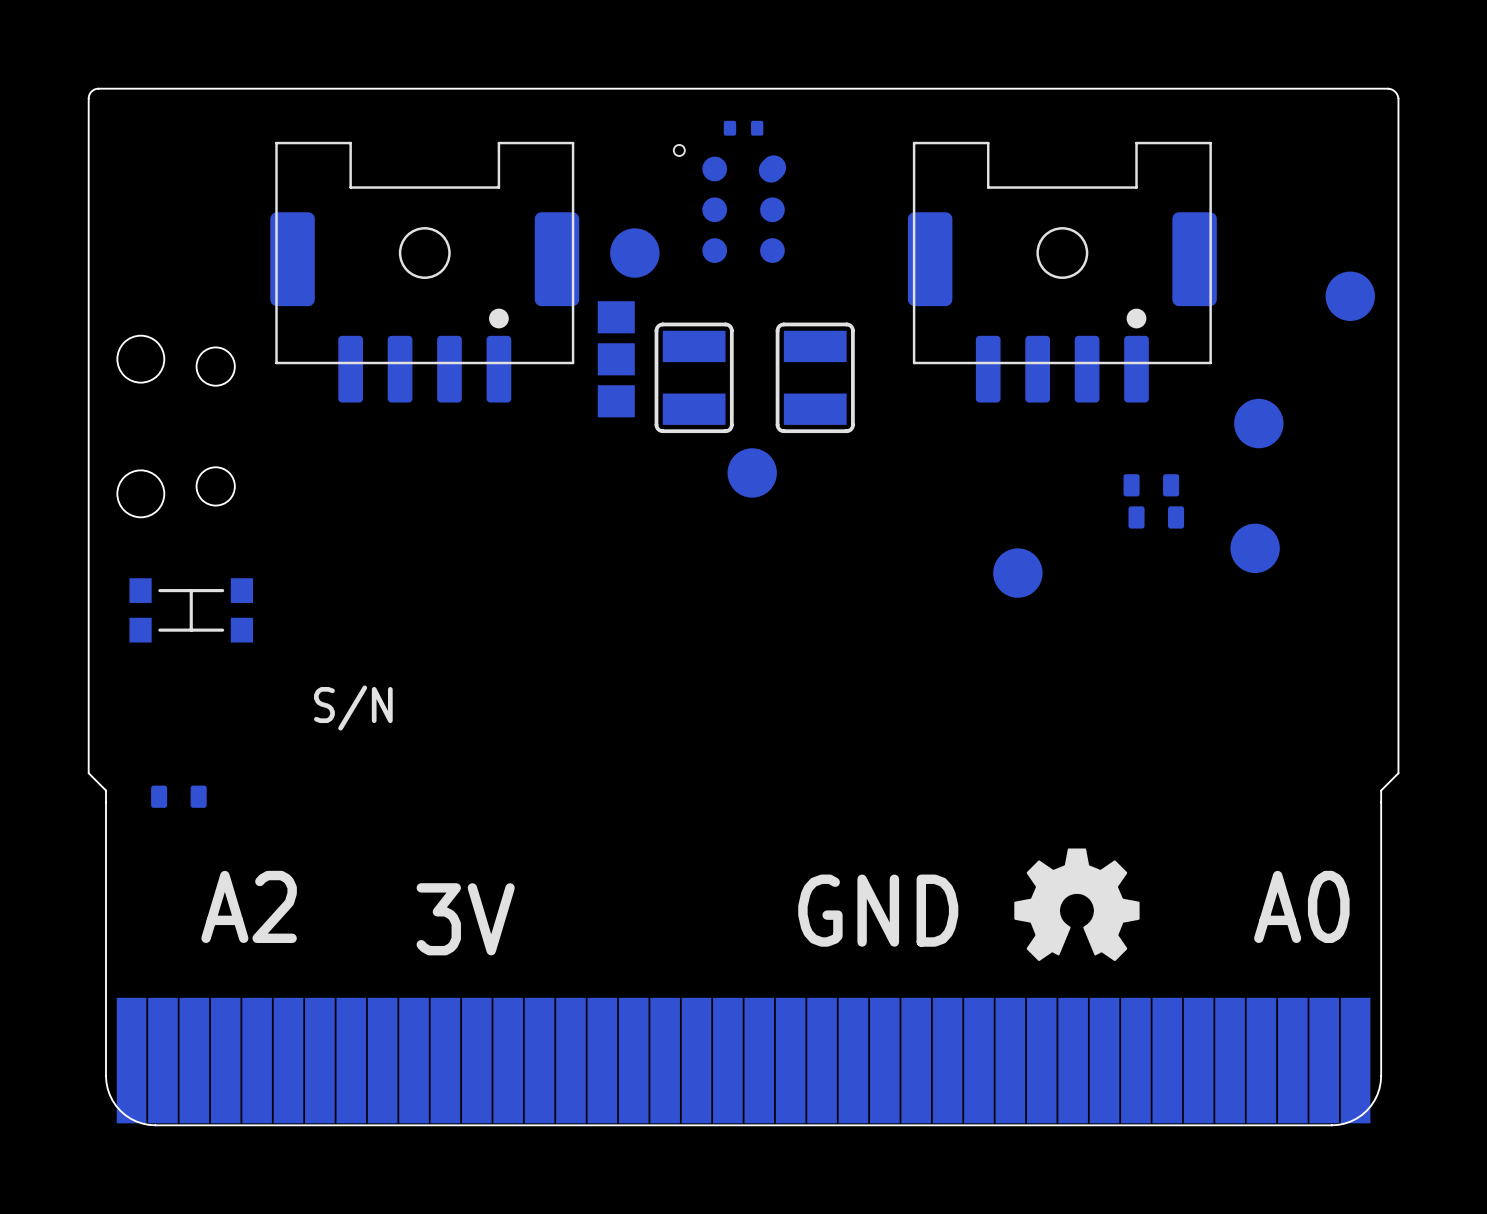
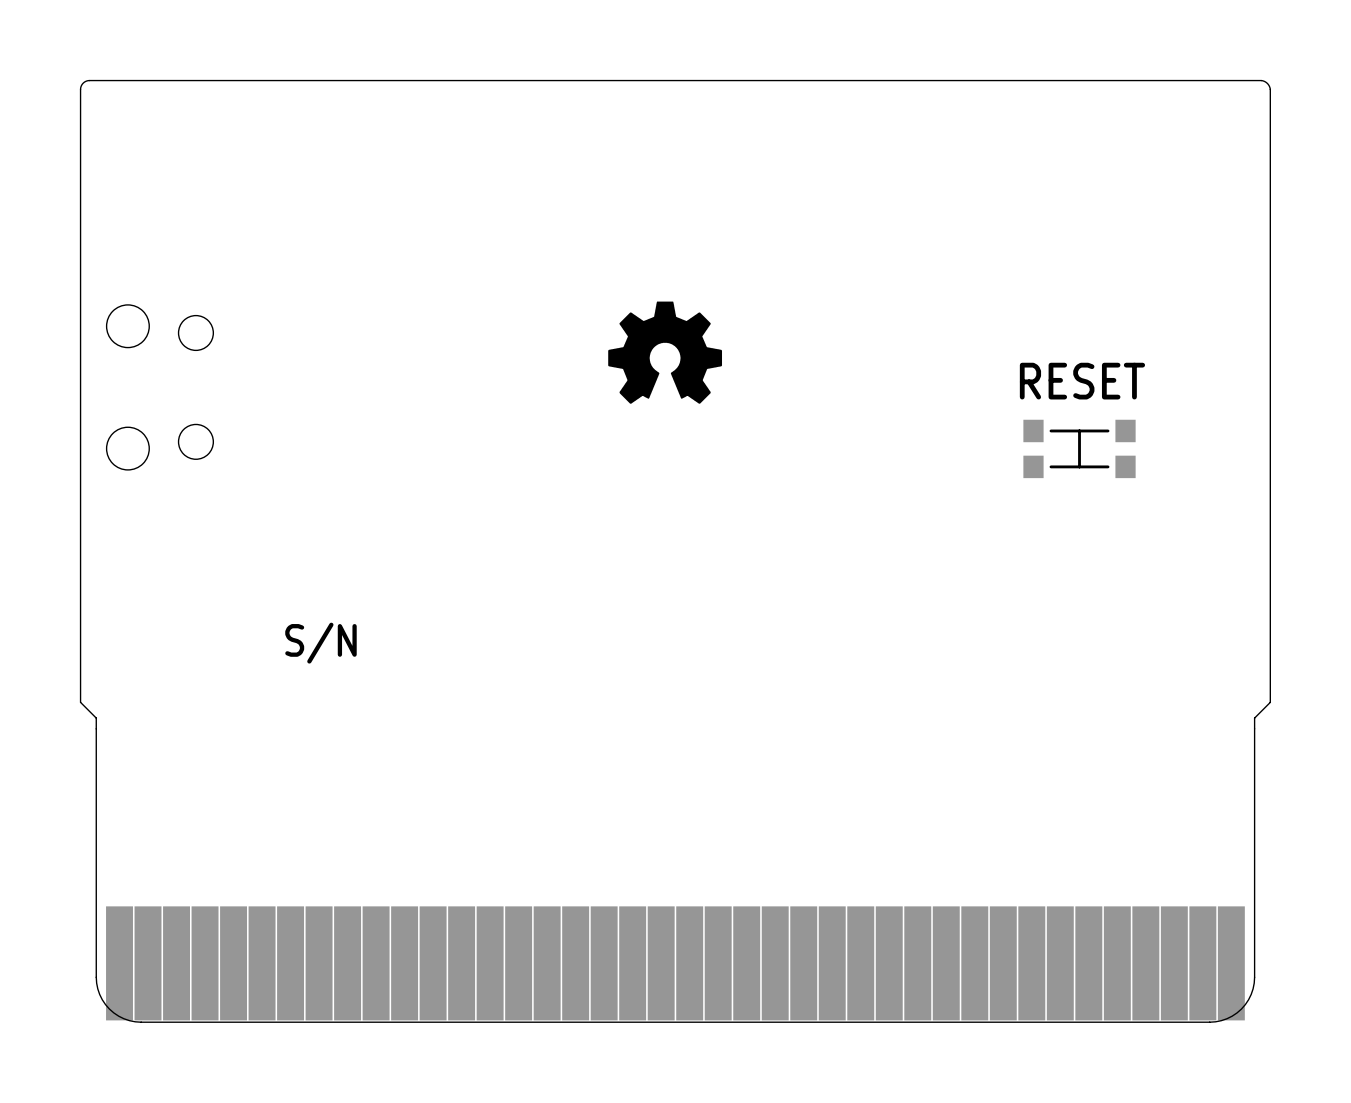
part: (743, 128) -> none
part: (729, 203) -> none
part: (634, 253) -> none
part: (424, 272) -> none
part: (1062, 272) -> none
part: (1350, 296) -> none
drawing: none -> [608, 301, 723, 404]
part: (616, 359) -> none
part: (694, 377) -> none
part: (815, 377) -> none
text: none -> RESET (1082, 381)
part: (1258, 423) -> none
part: (752, 472) -> none
part: (1151, 485) -> none
part: none -> (1079, 448)
part: (1156, 517) -> none
part: (1255, 548) -> none
part: (1017, 573) -> none
part: (191, 610) -> none
part: (178, 796) -> none
drawing: [1014, 848, 1140, 961] -> none
text: A2 (249, 906) -> none
text: A0 (1301, 906) -> none
text: GND (878, 910) -> none
text: 3V (465, 919) -> none

